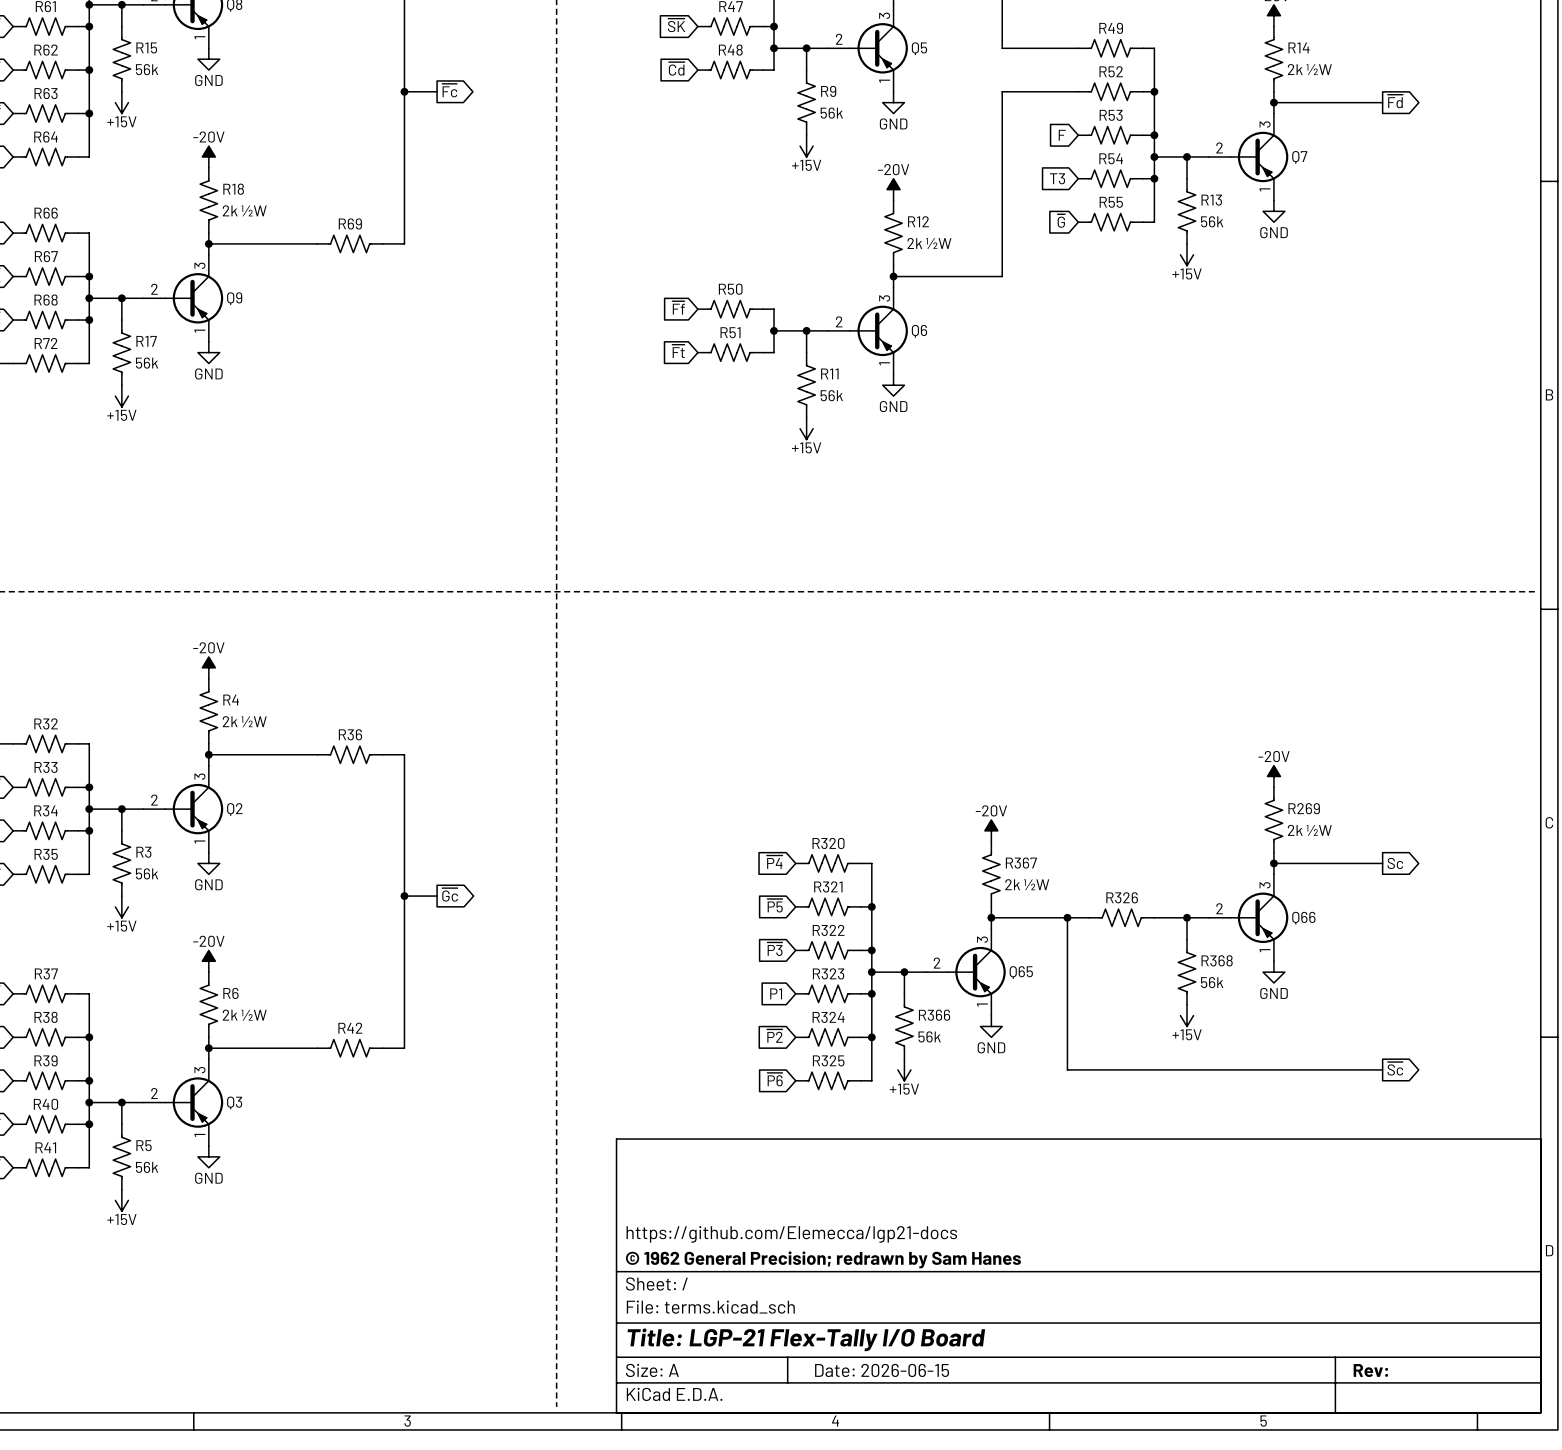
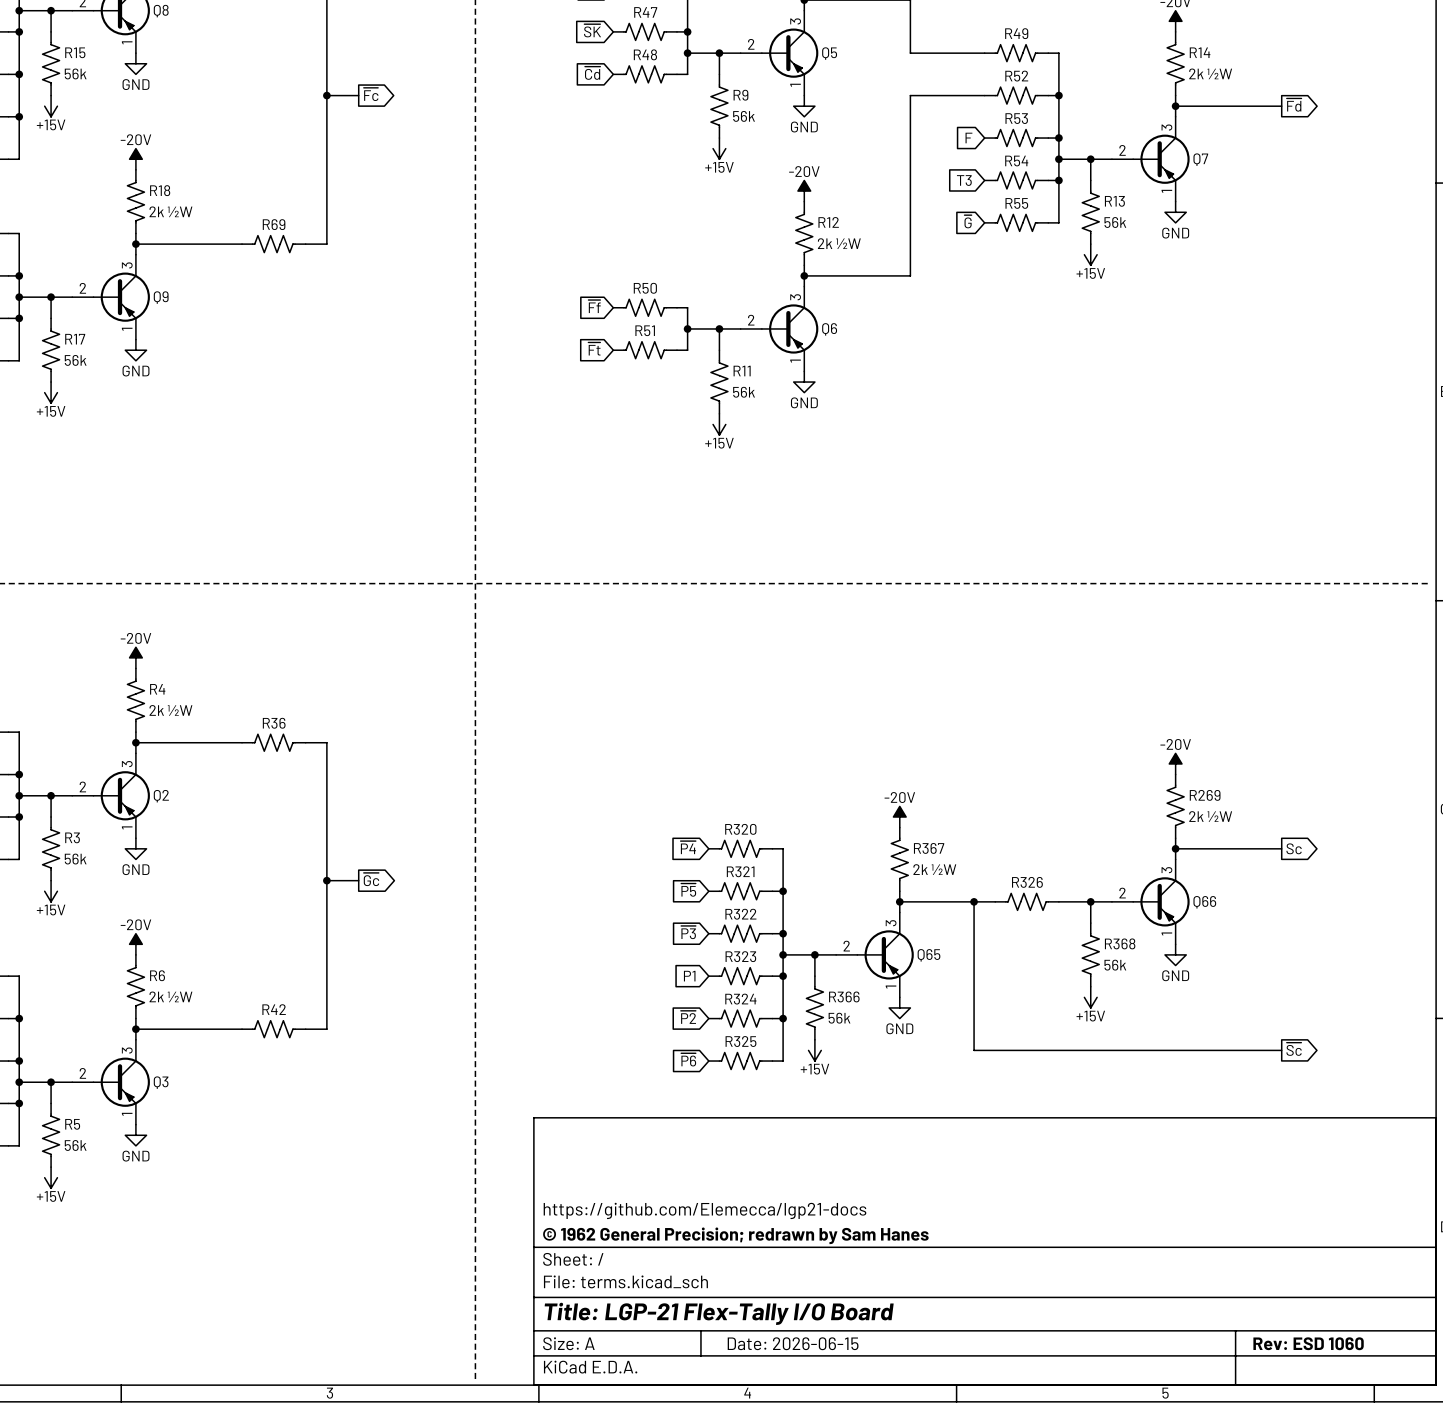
title block: Rev: (1370, 1370) -> Rev: ESD 1060 (1308, 1343)

